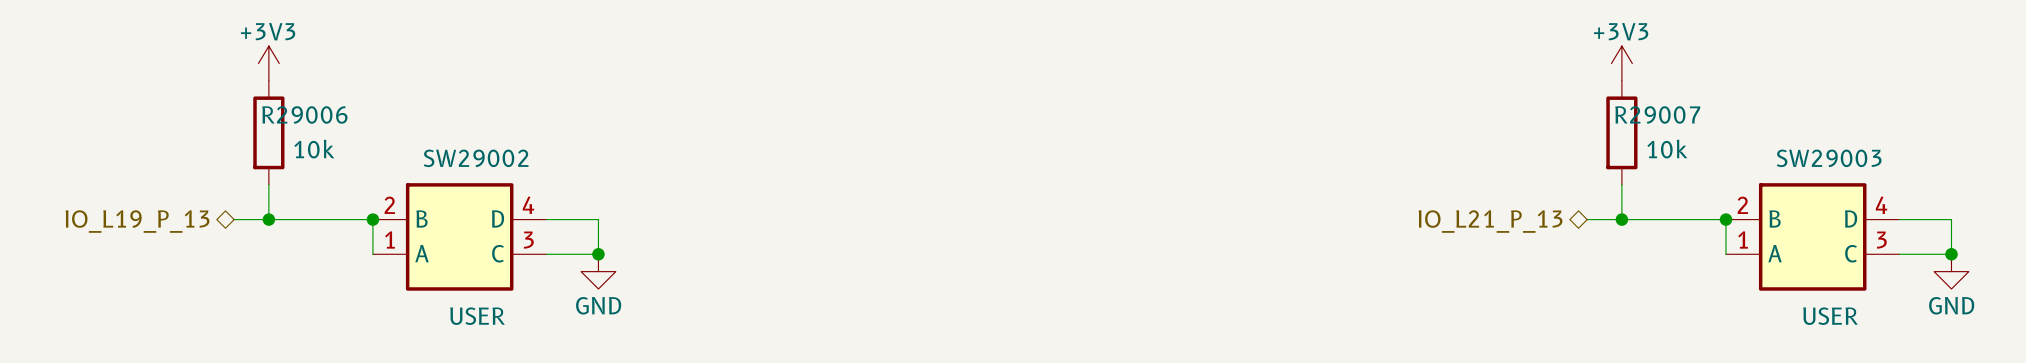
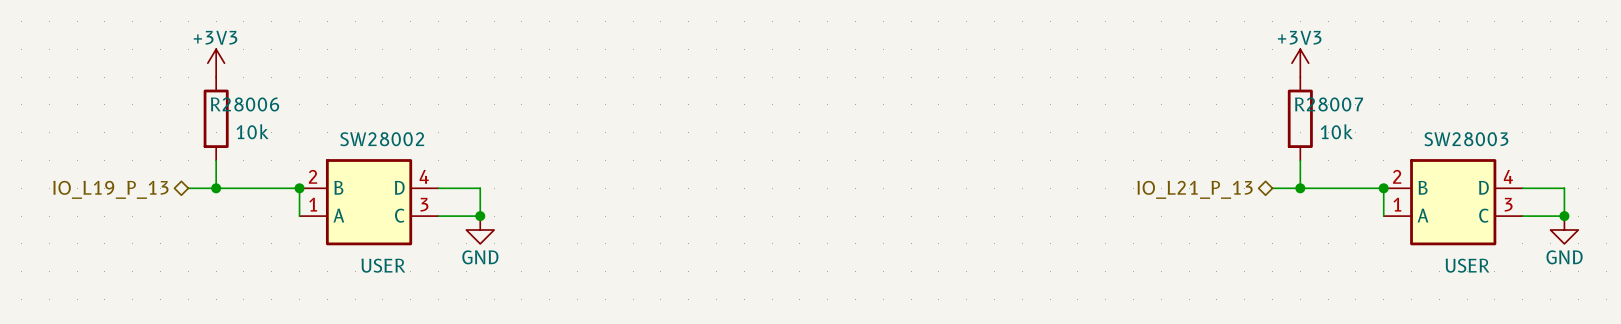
R29006 name: R29006 (304, 114) -> R28006 (245, 104)
R29007 name: R29007 (1657, 114) -> R28007 (1329, 104)
SW29002 name: SW29002 (476, 158) -> SW28002 (382, 139)
SW29003 name: SW29003 (1829, 158) -> SW28003 (1466, 139)

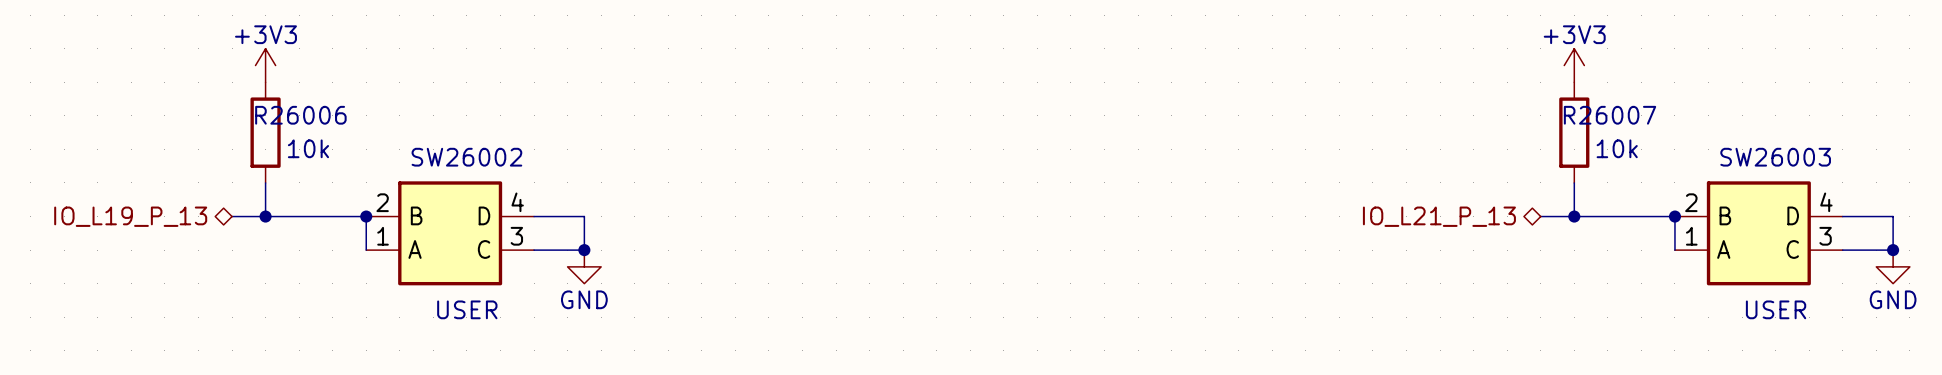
R28006 name: R28006 (245, 104) -> R26006 (300, 115)
R28007 name: R28007 (1329, 104) -> R26007 (1610, 115)
SW28002 name: SW28002 (382, 139) -> SW26002 (466, 157)
SW28003 name: SW28003 (1466, 139) -> SW26003 (1775, 157)

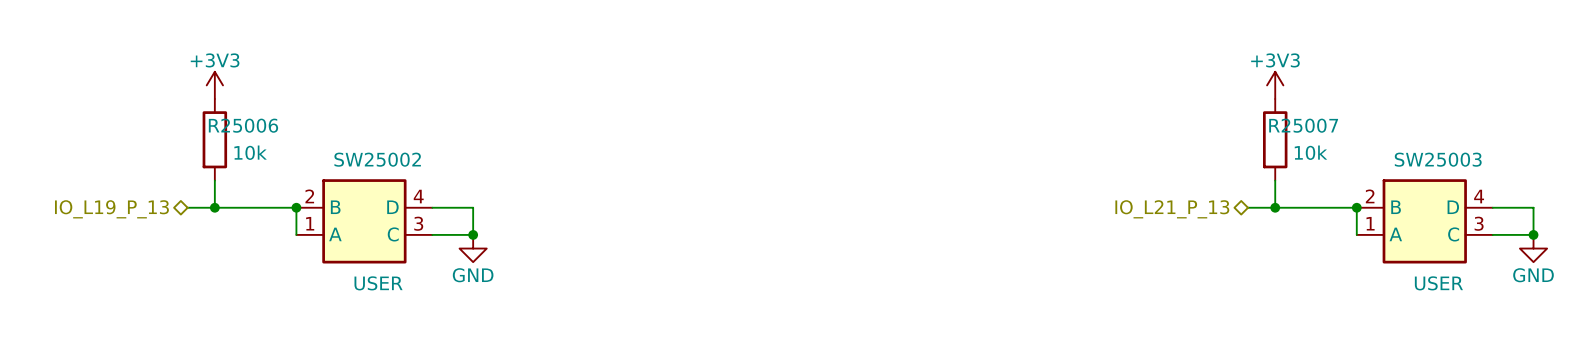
R26006 name: R26006 (300, 115) -> R25006 (243, 125)
R26007 name: R26007 (1610, 115) -> R25007 (1303, 125)
SW26002 name: SW26002 (466, 157) -> SW25002 (377, 159)
SW26003 name: SW26003 (1775, 157) -> SW25003 (1438, 159)

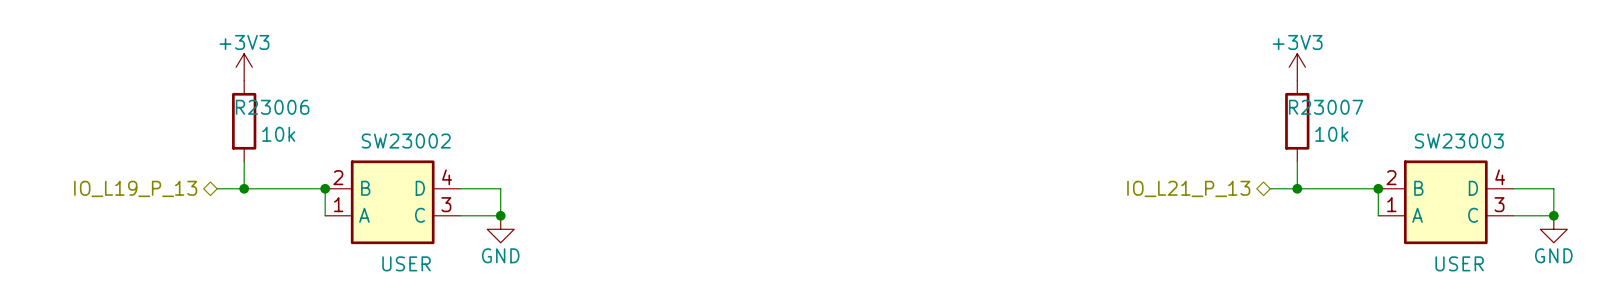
R25006 name: R25006 (243, 125) -> R23006 (272, 107)
R25007 name: R25007 (1303, 125) -> R23007 (1326, 107)
SW25002 name: SW25002 (377, 159) -> SW23002 (406, 141)
SW25003 name: SW25003 (1438, 159) -> SW23003 (1459, 141)

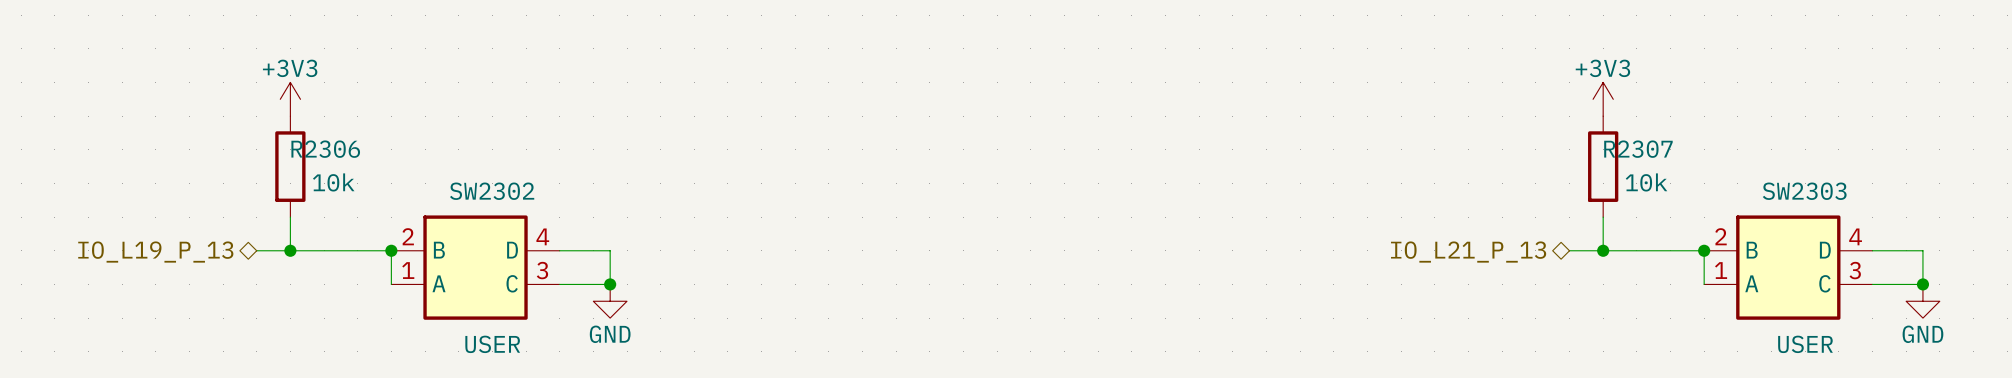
R23006 name: R23006 (272, 107) -> R2306 (325, 149)
R23007 name: R23007 (1326, 107) -> R2307 (1638, 149)
SW23002 name: SW23002 (406, 141) -> SW2302 (492, 191)
SW23003 name: SW23003 (1459, 141) -> SW2303 (1804, 191)

